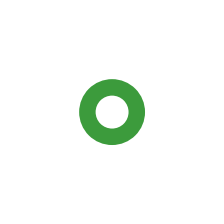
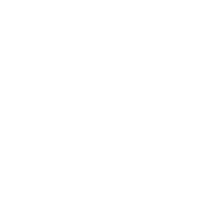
part: (112, 112) -> none

